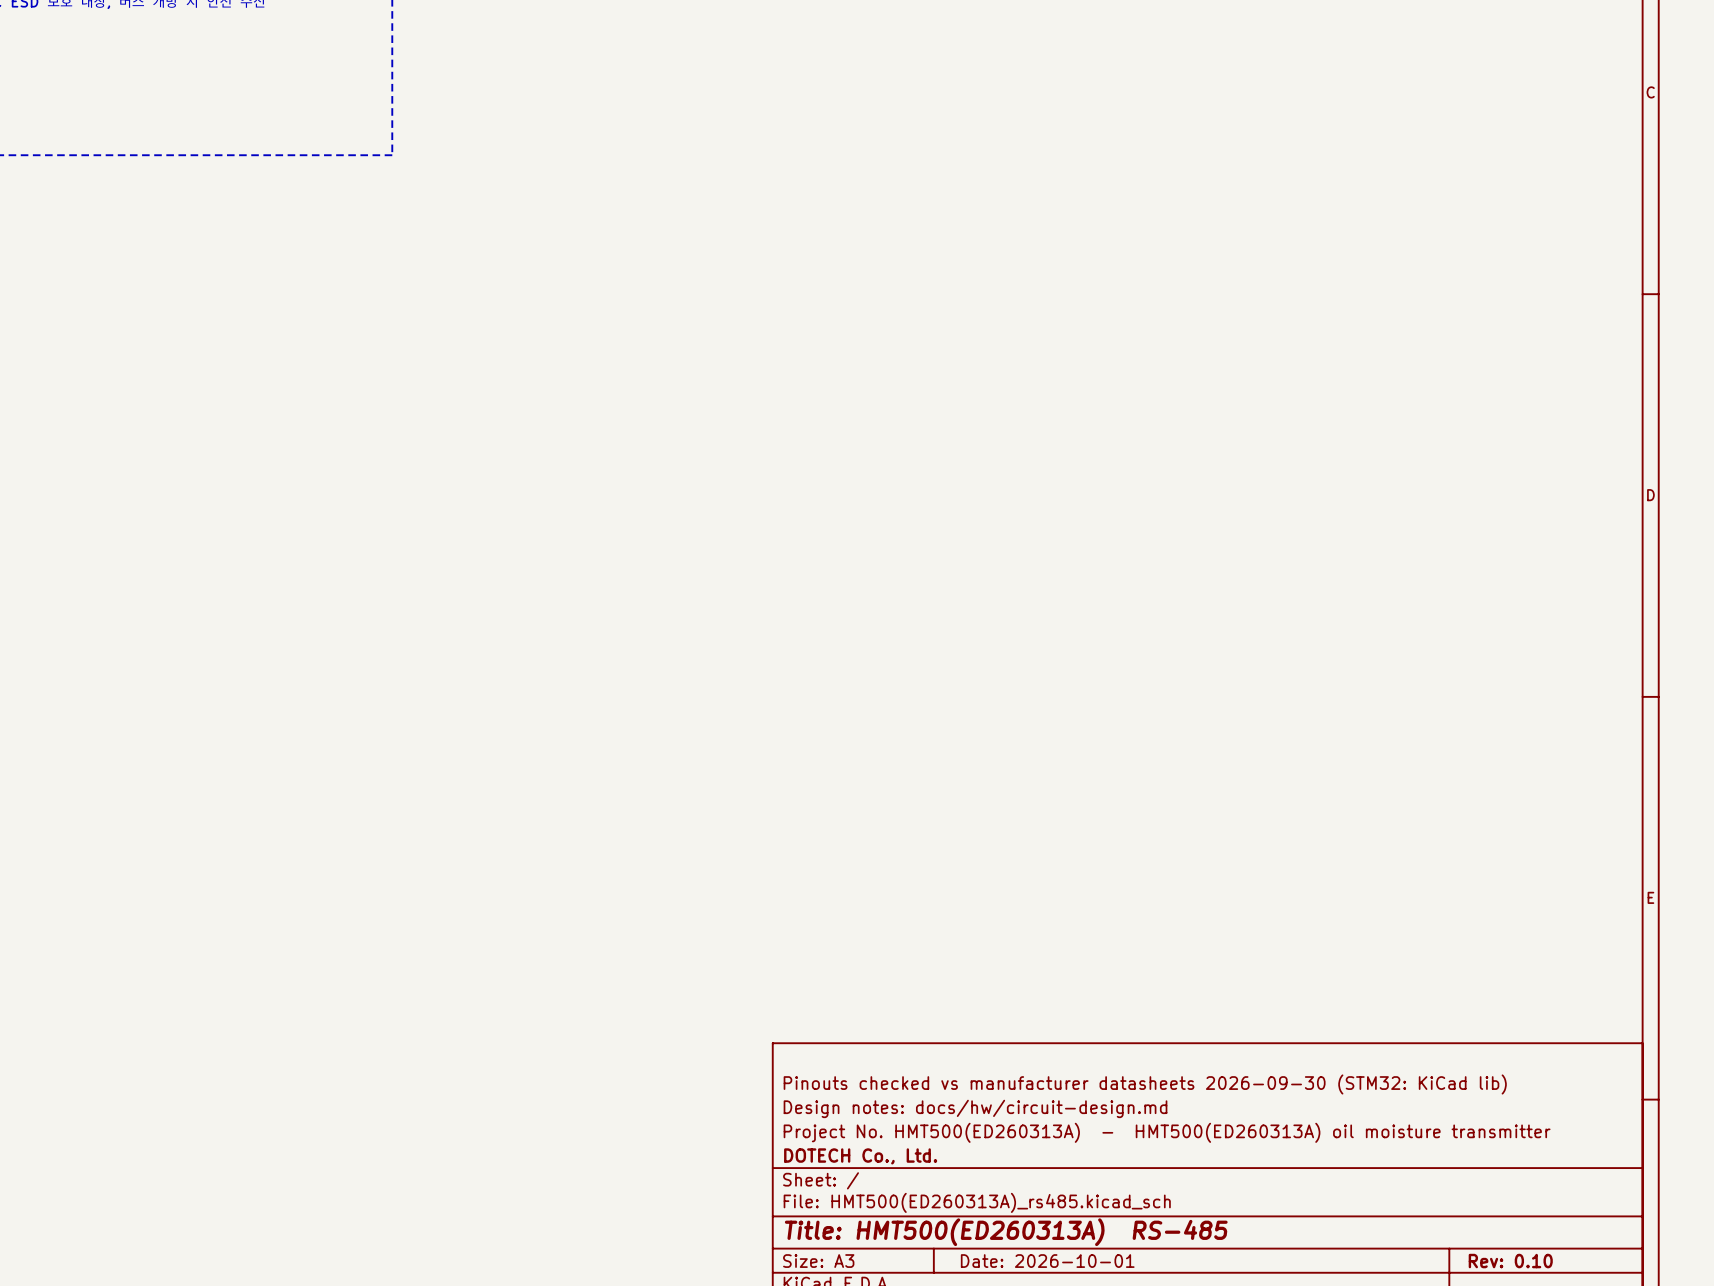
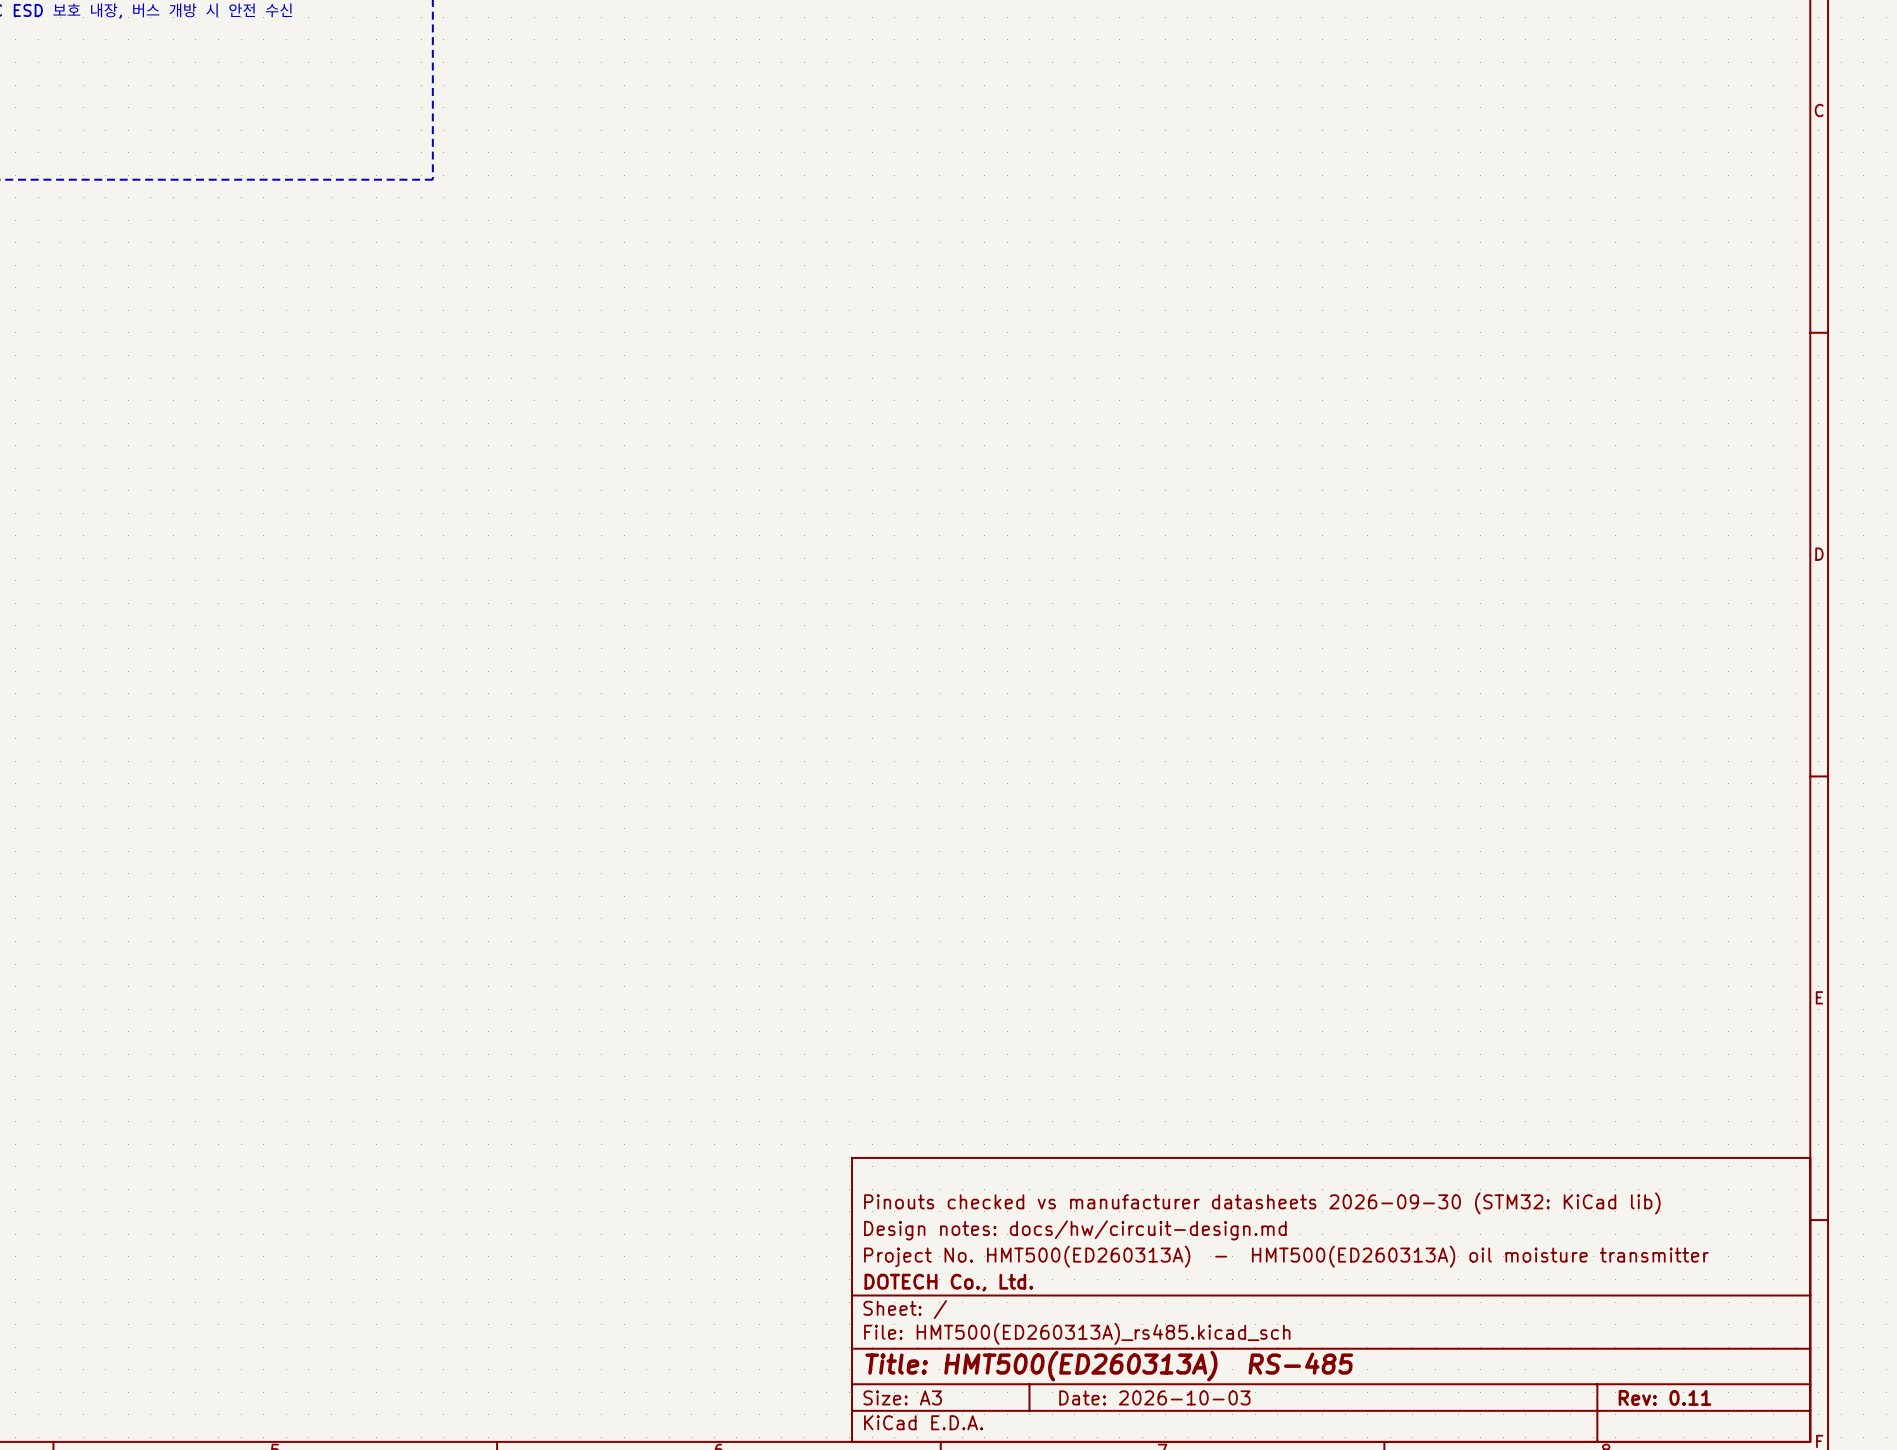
title block: Date: 2026-10-01 (1047, 1261) -> Date: 2026-10-03 (1154, 1397)
title block: Rev: 0.10 (1510, 1261) -> Rev: 0.11 (1665, 1397)

